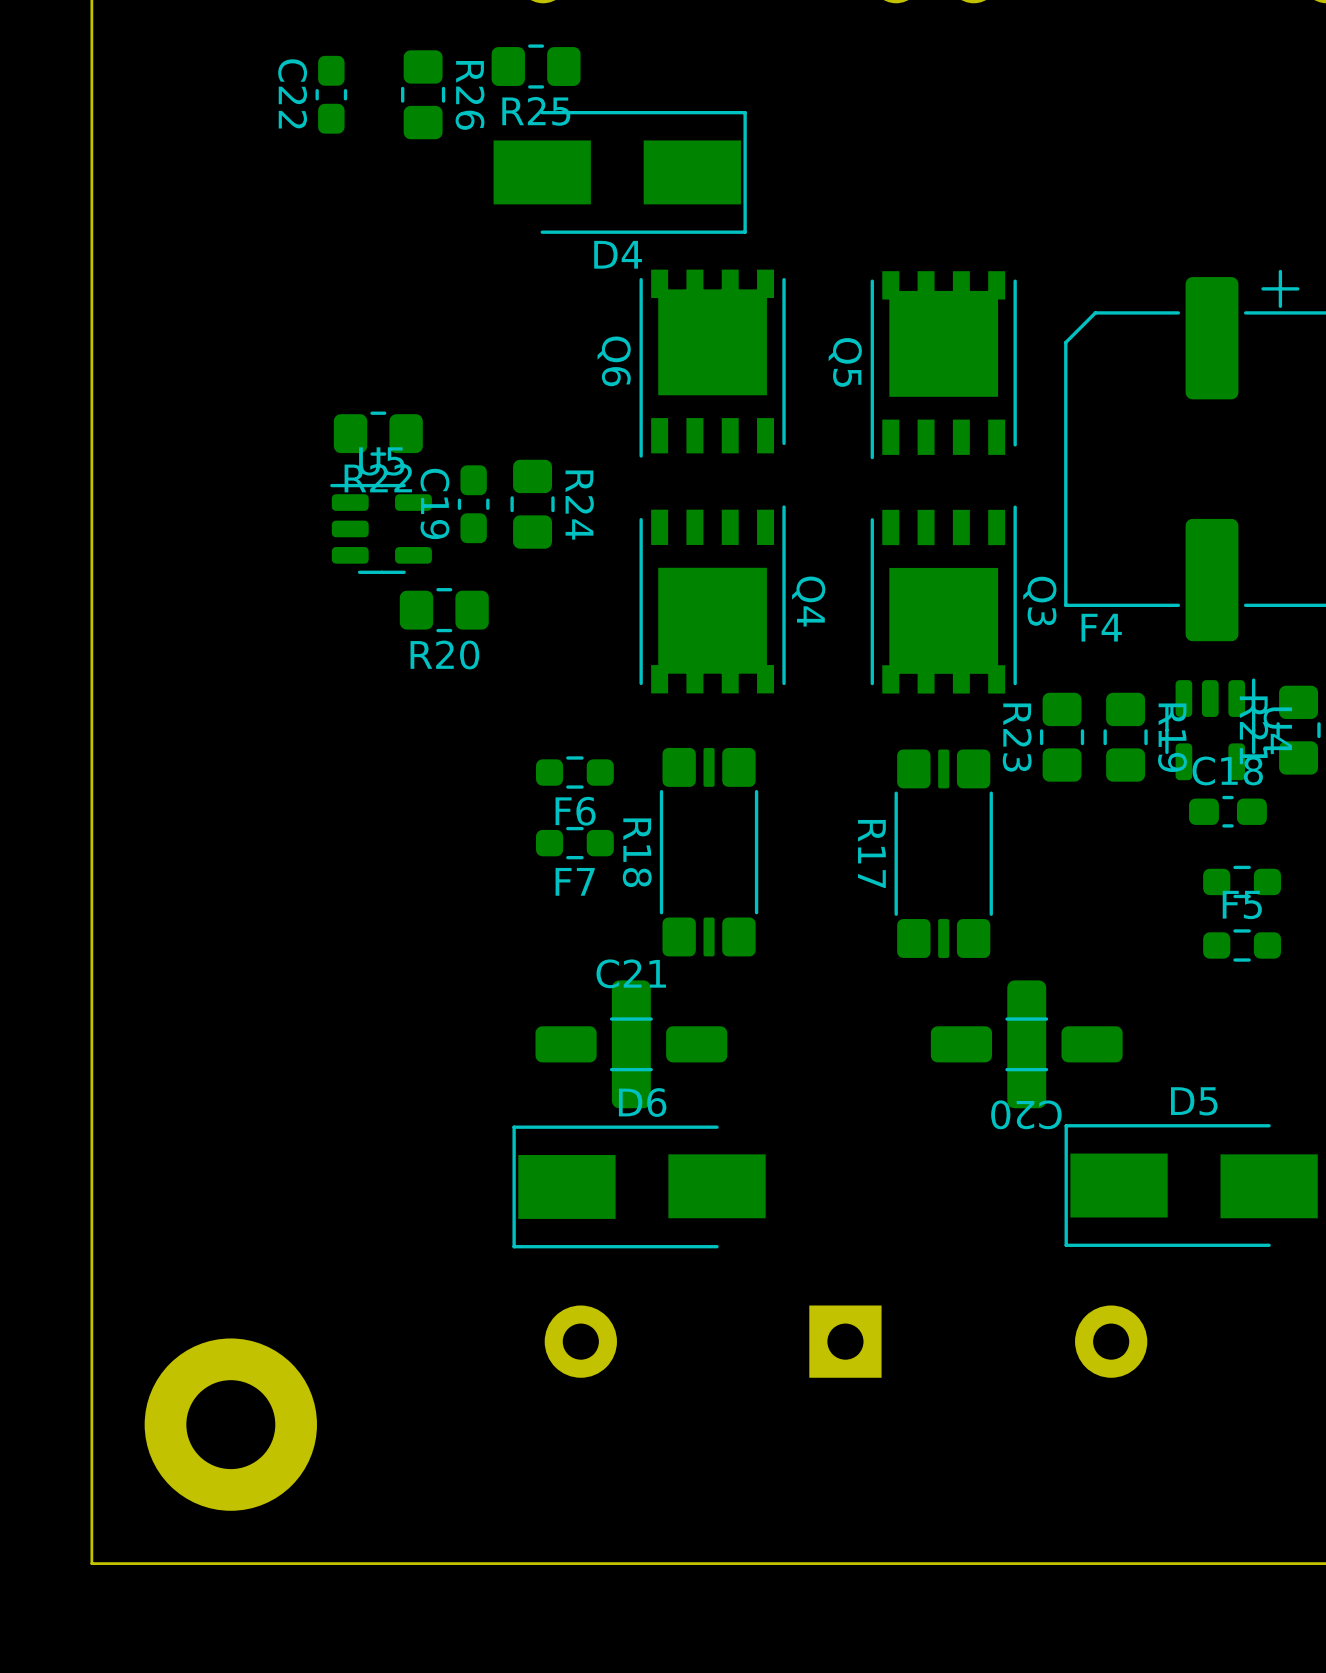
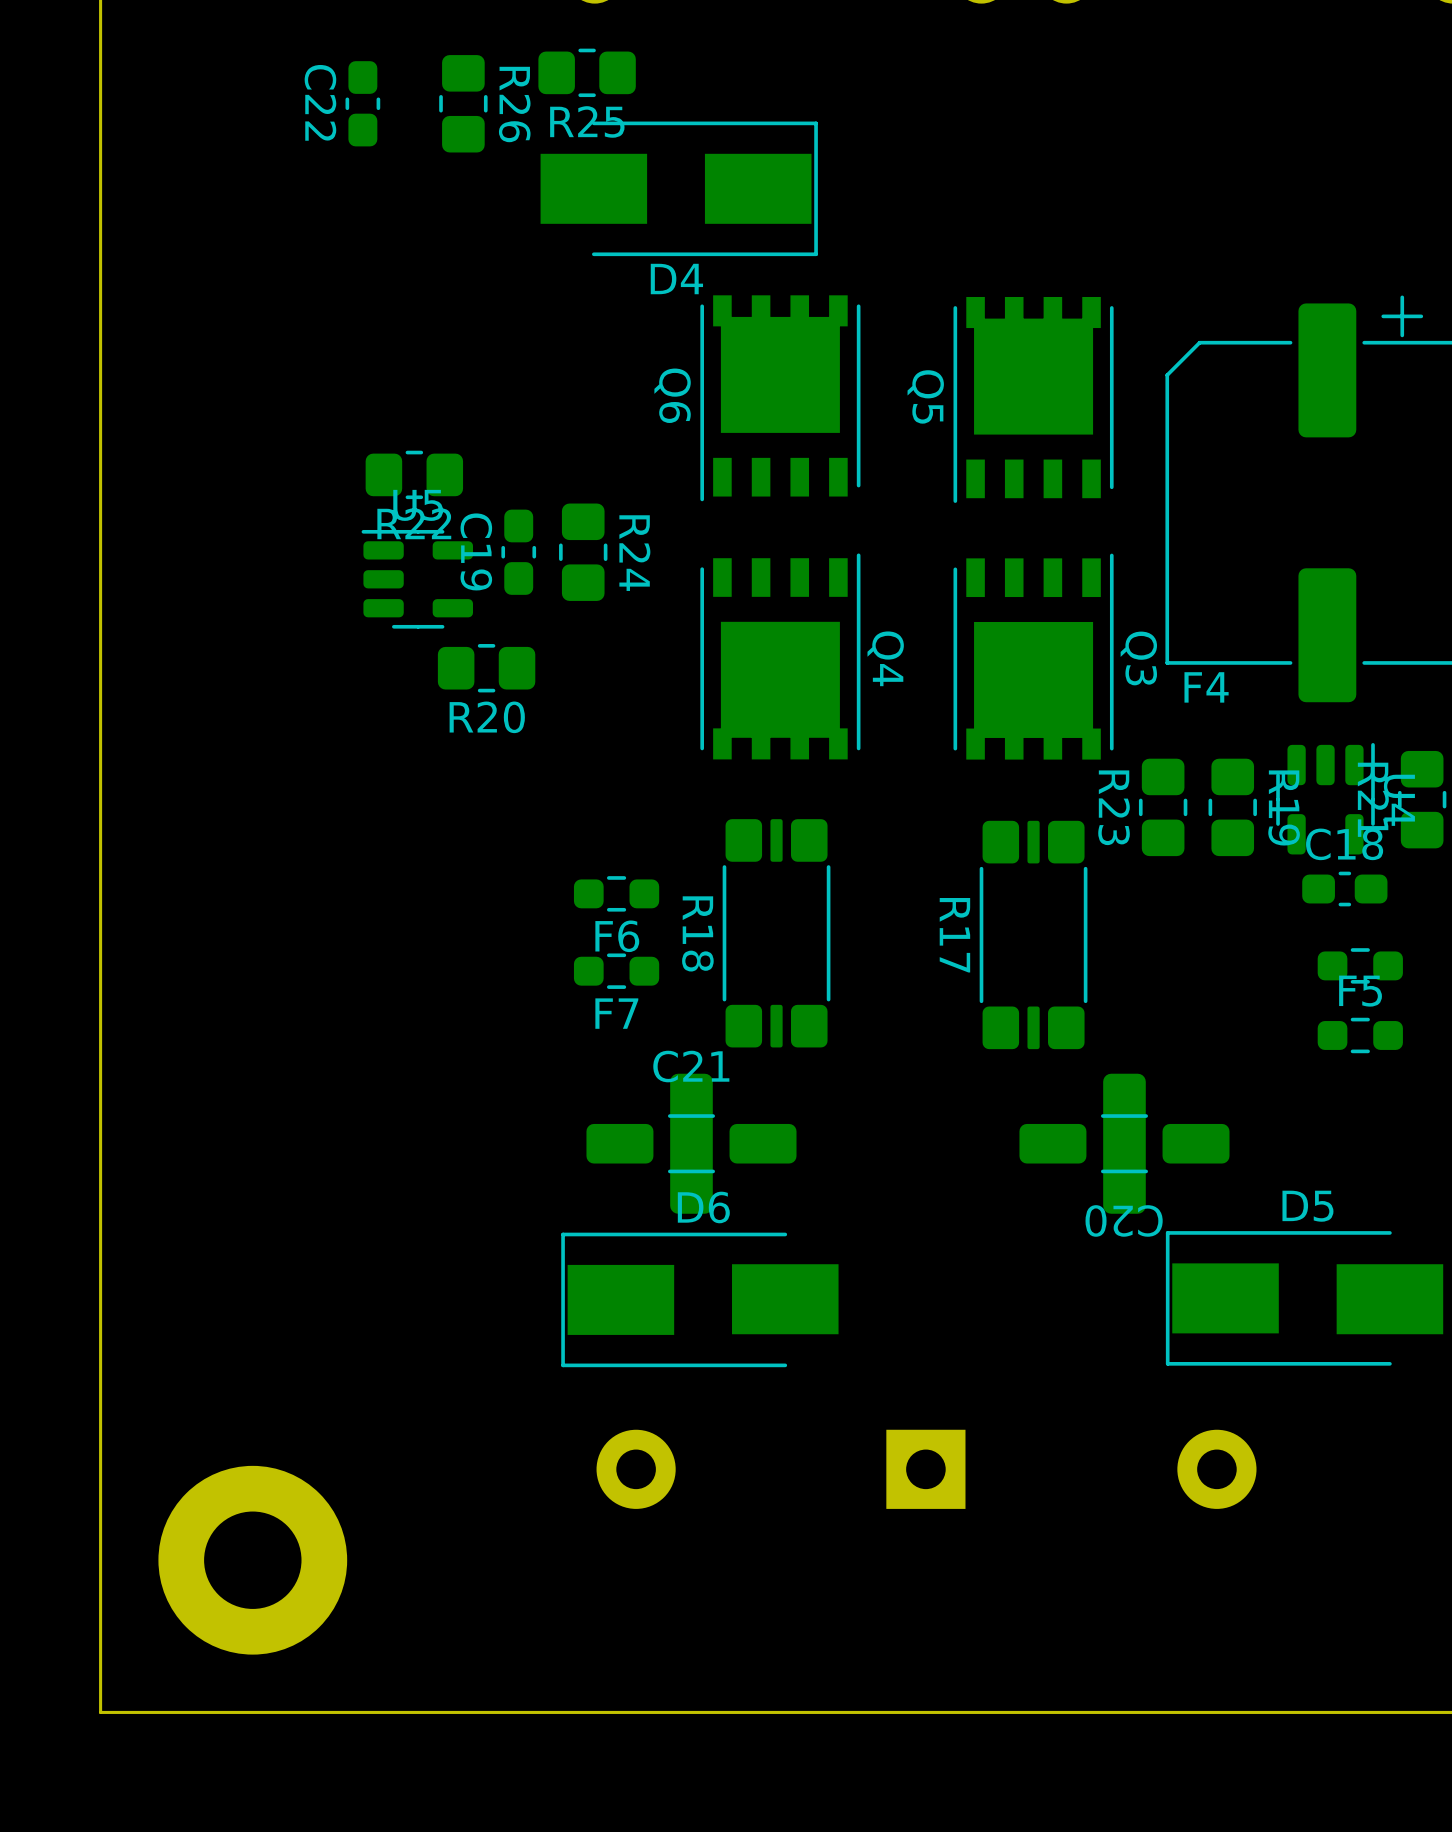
F6 position: (574, 772) -> (616, 893)
F7 position: (574, 843) -> (616, 971)

